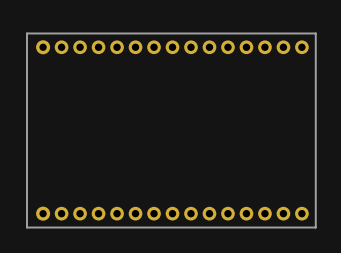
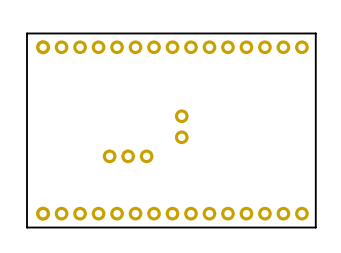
part: none -> (181, 126)
part: none -> (128, 156)

